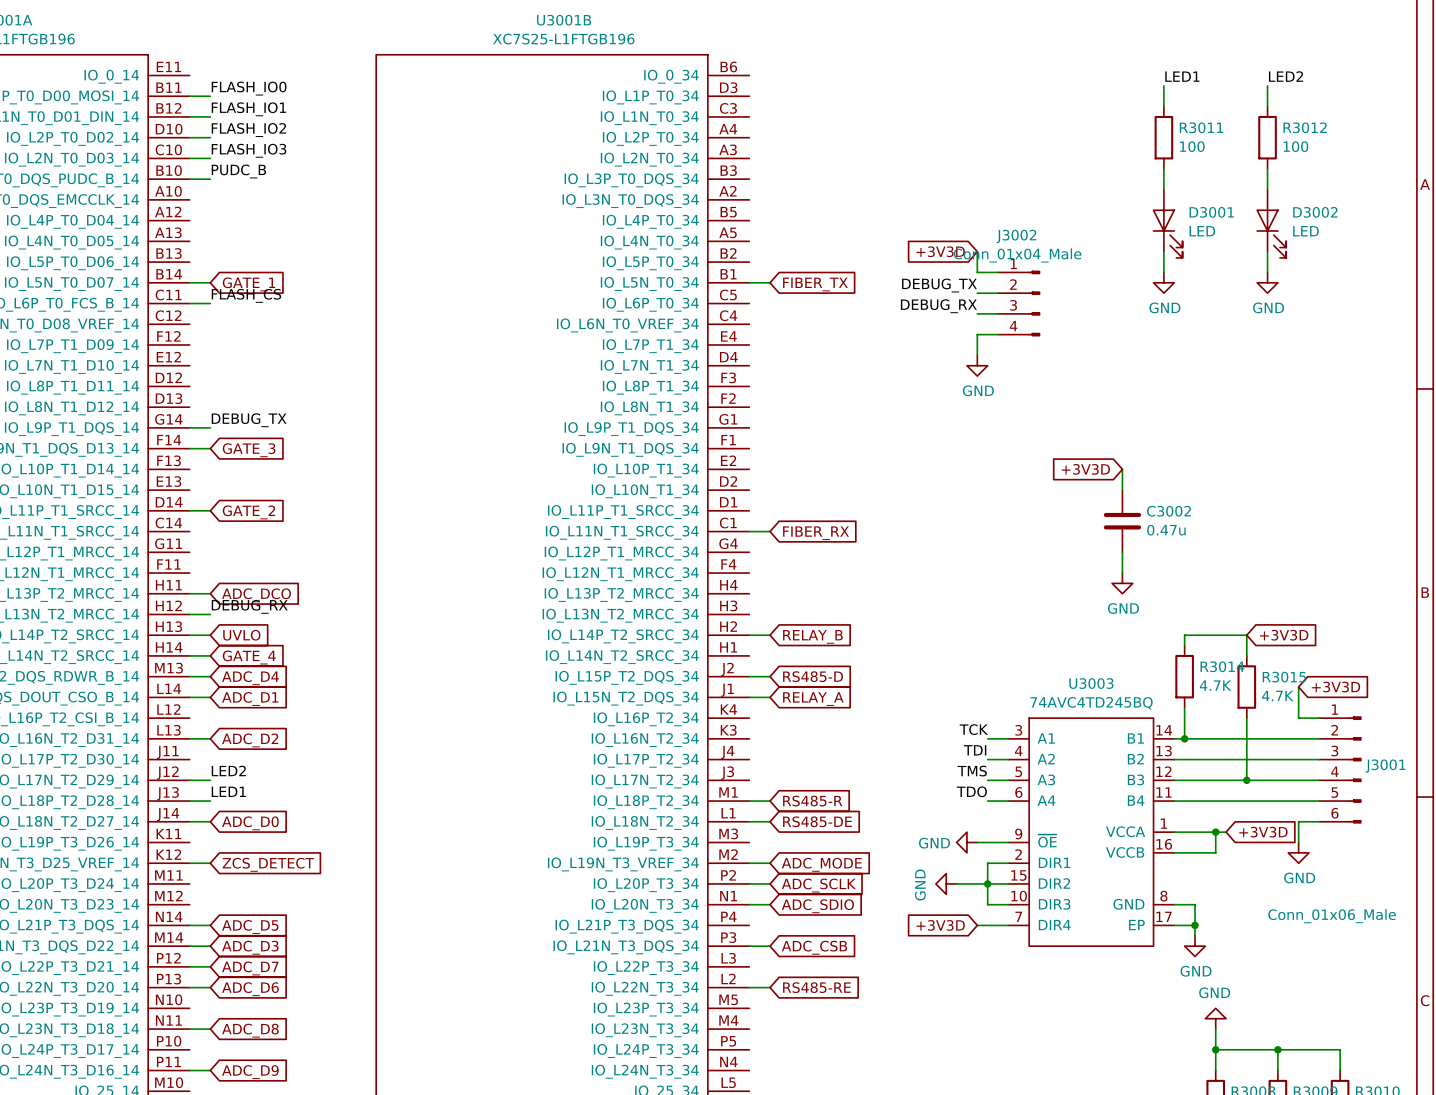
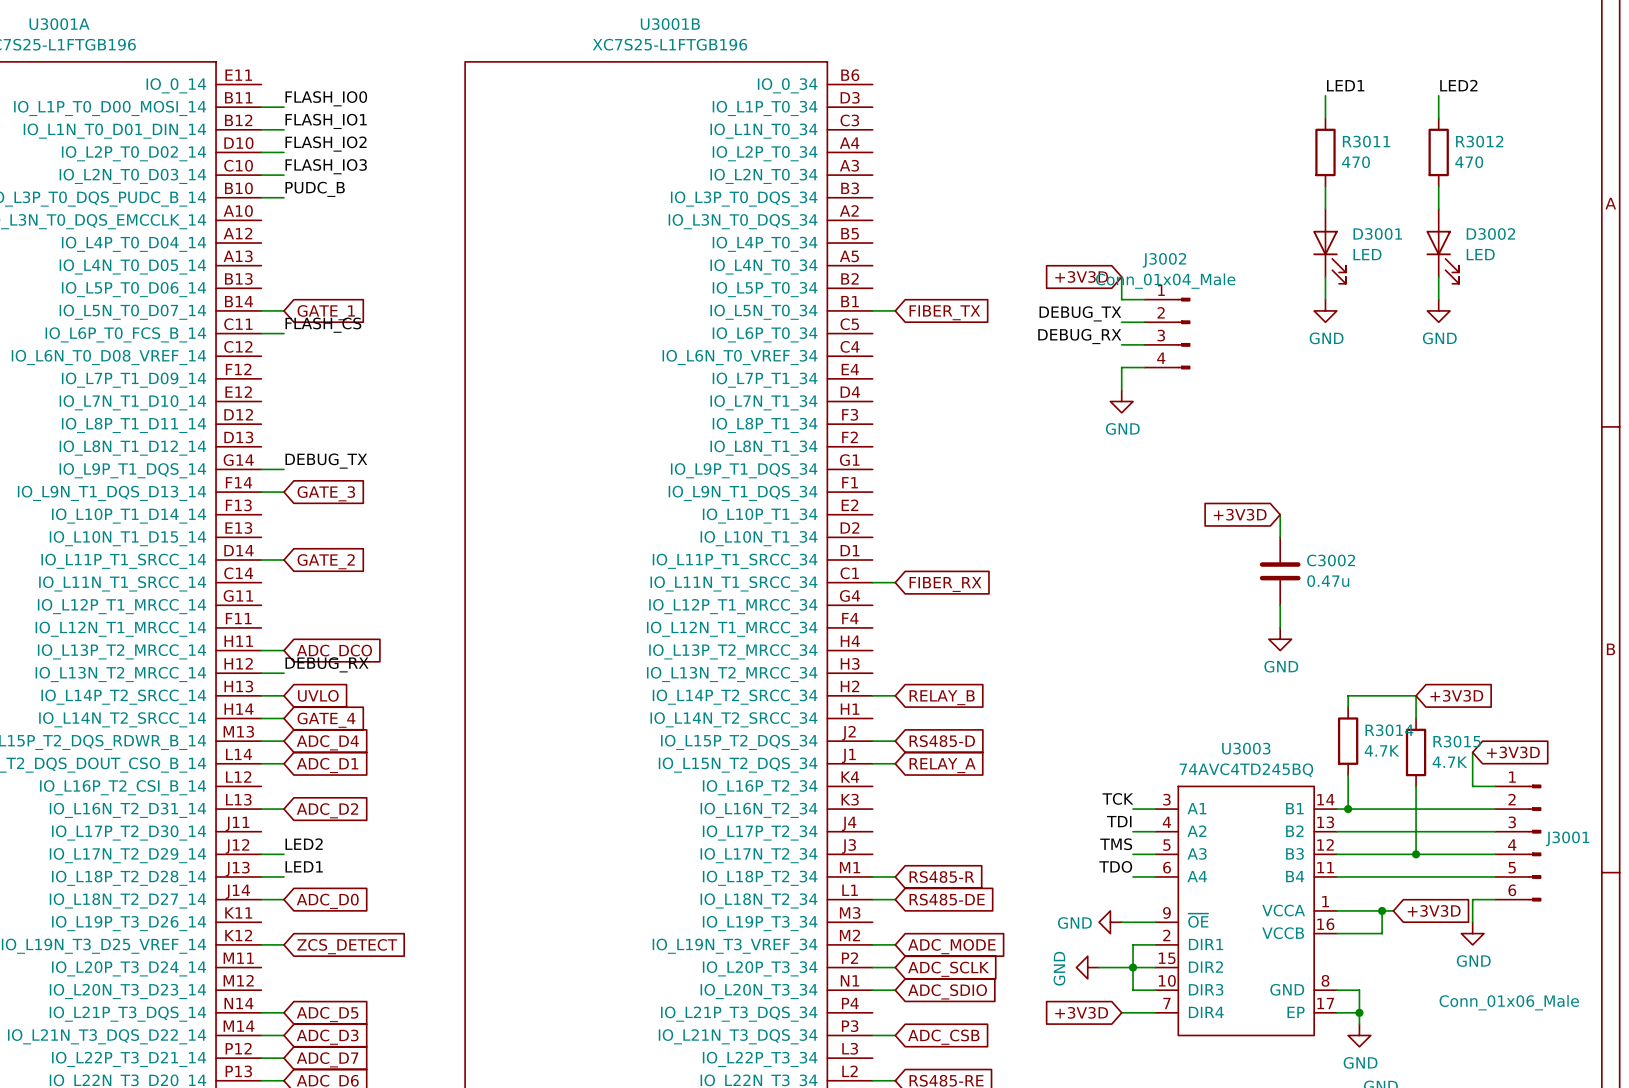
R3011 value: 100 (1192, 146) -> 470 (1356, 162)
R3012 value: 100 (1295, 146) -> 470 (1469, 162)

